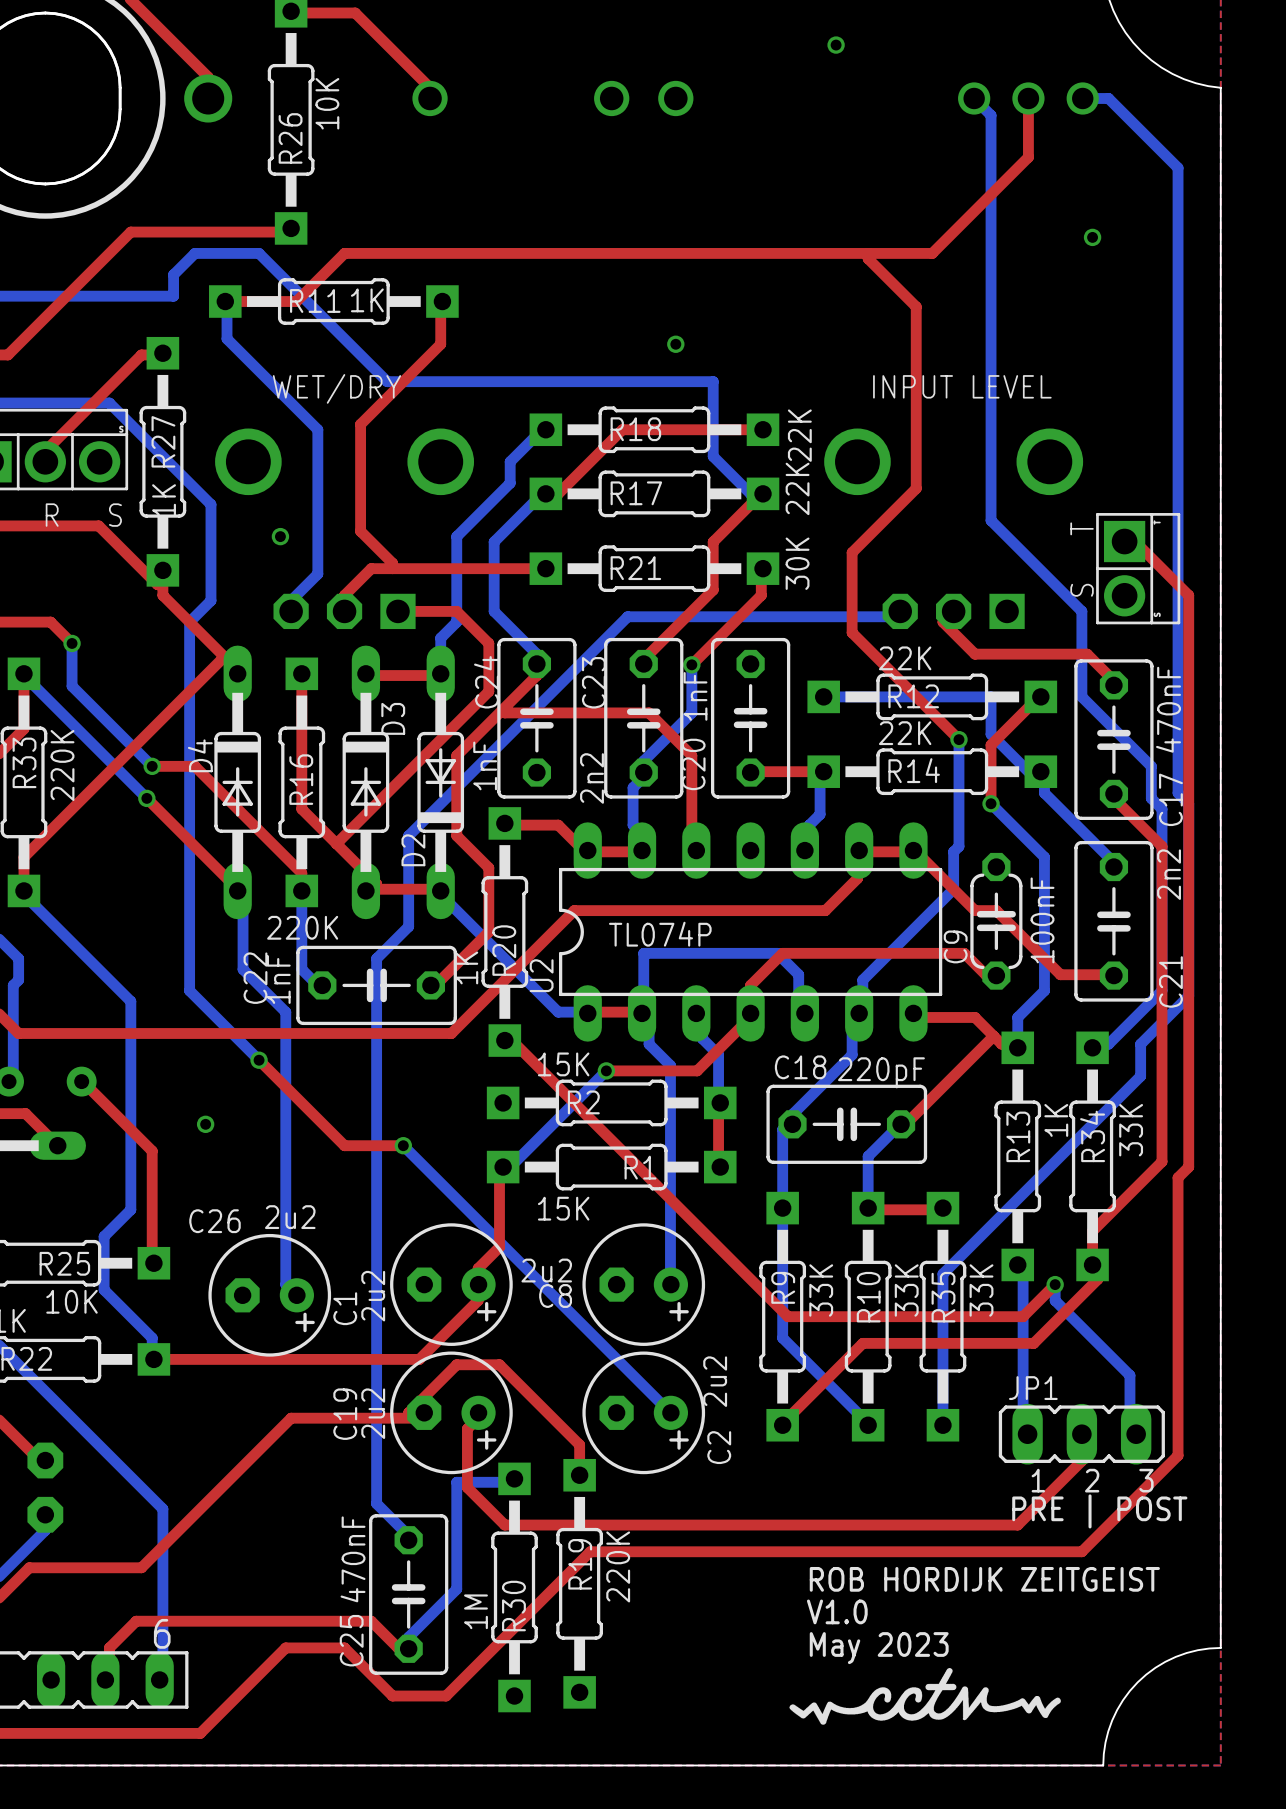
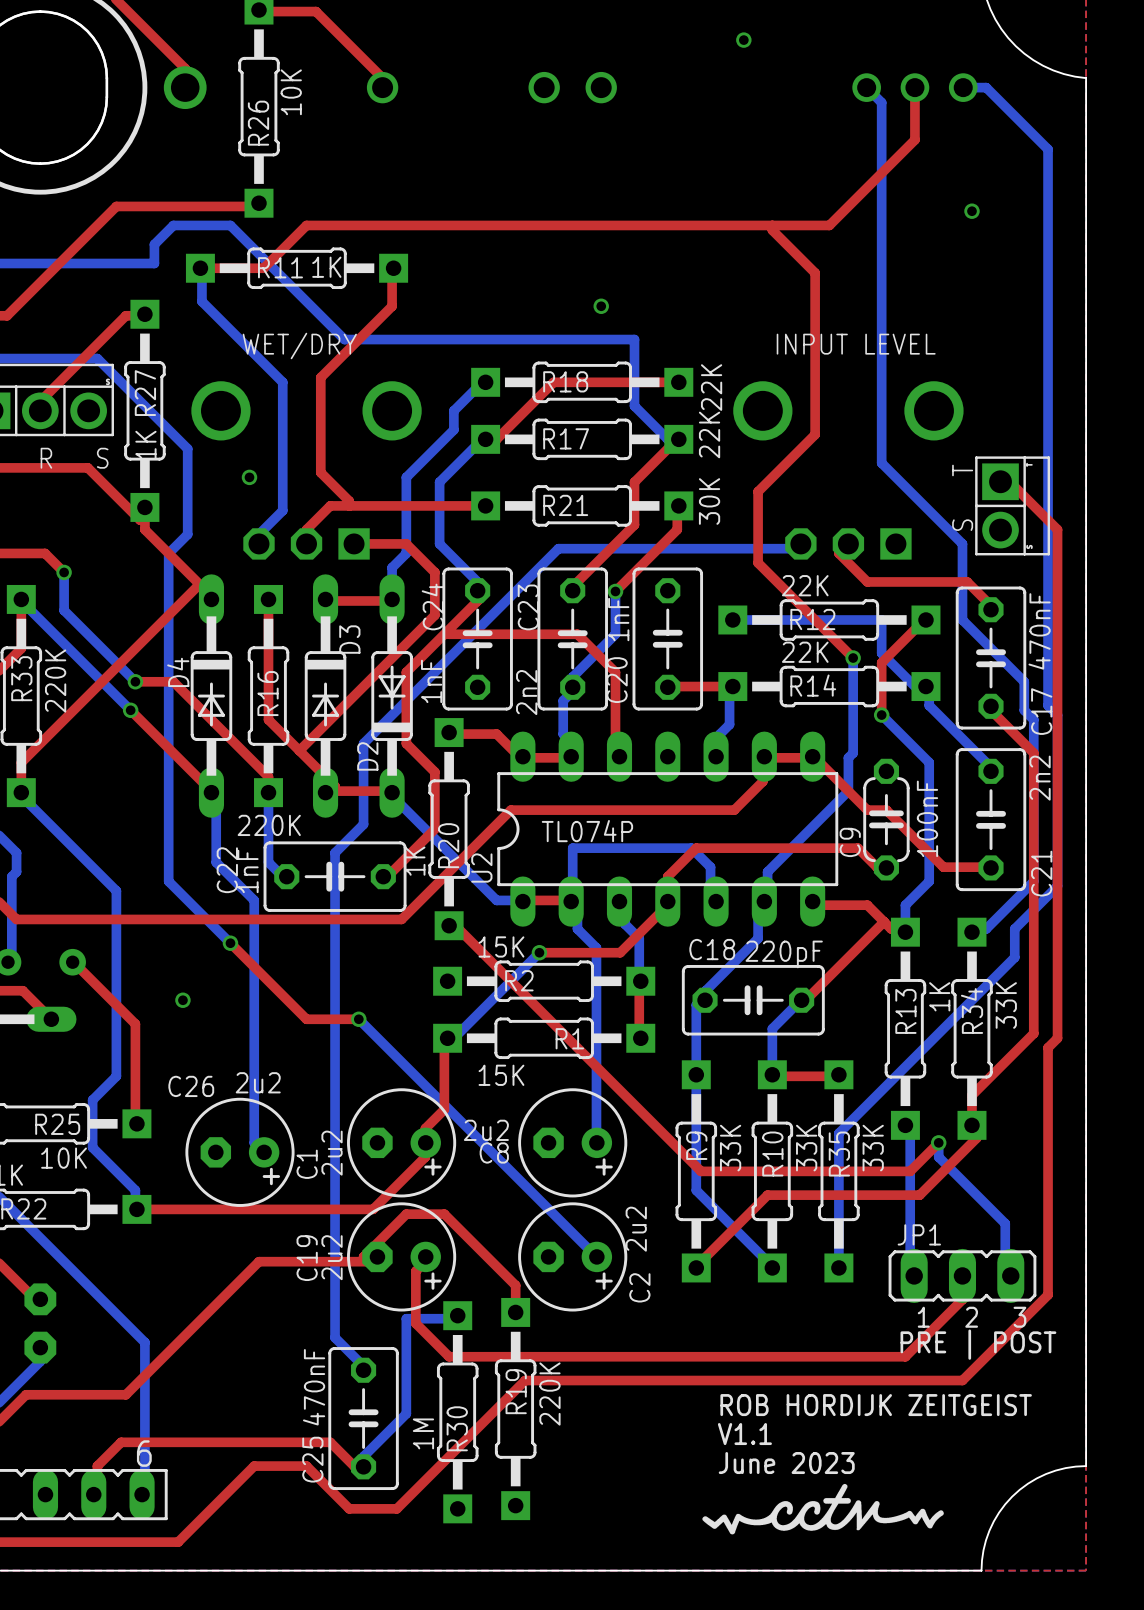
text: V1.0 (837, 1611) -> V1.1 (744, 1434)
text: May 2023 (879, 1648) -> June 2023 (786, 1463)

